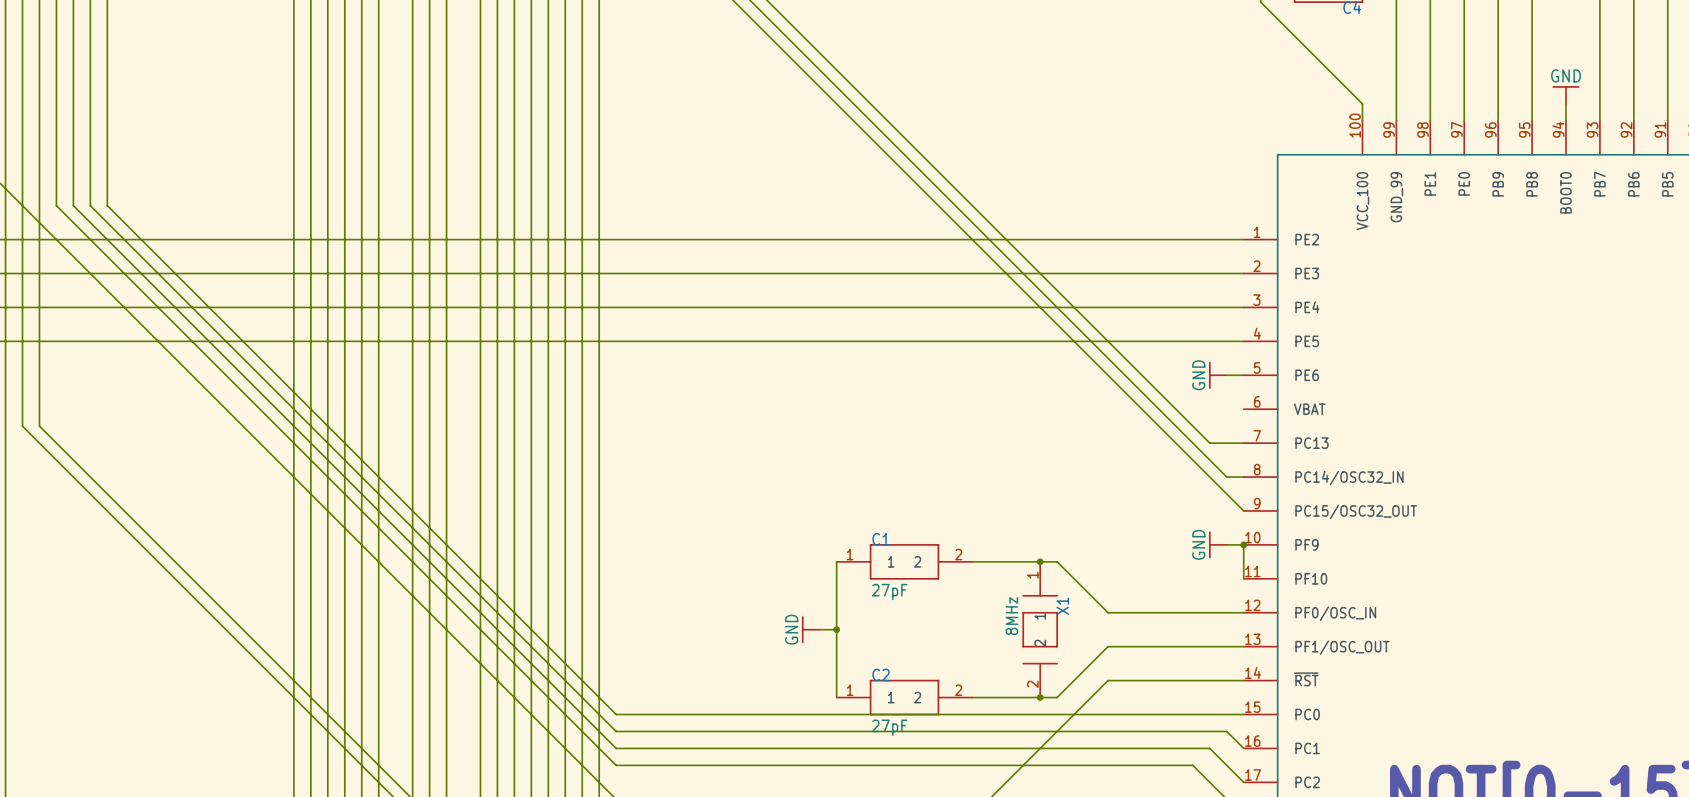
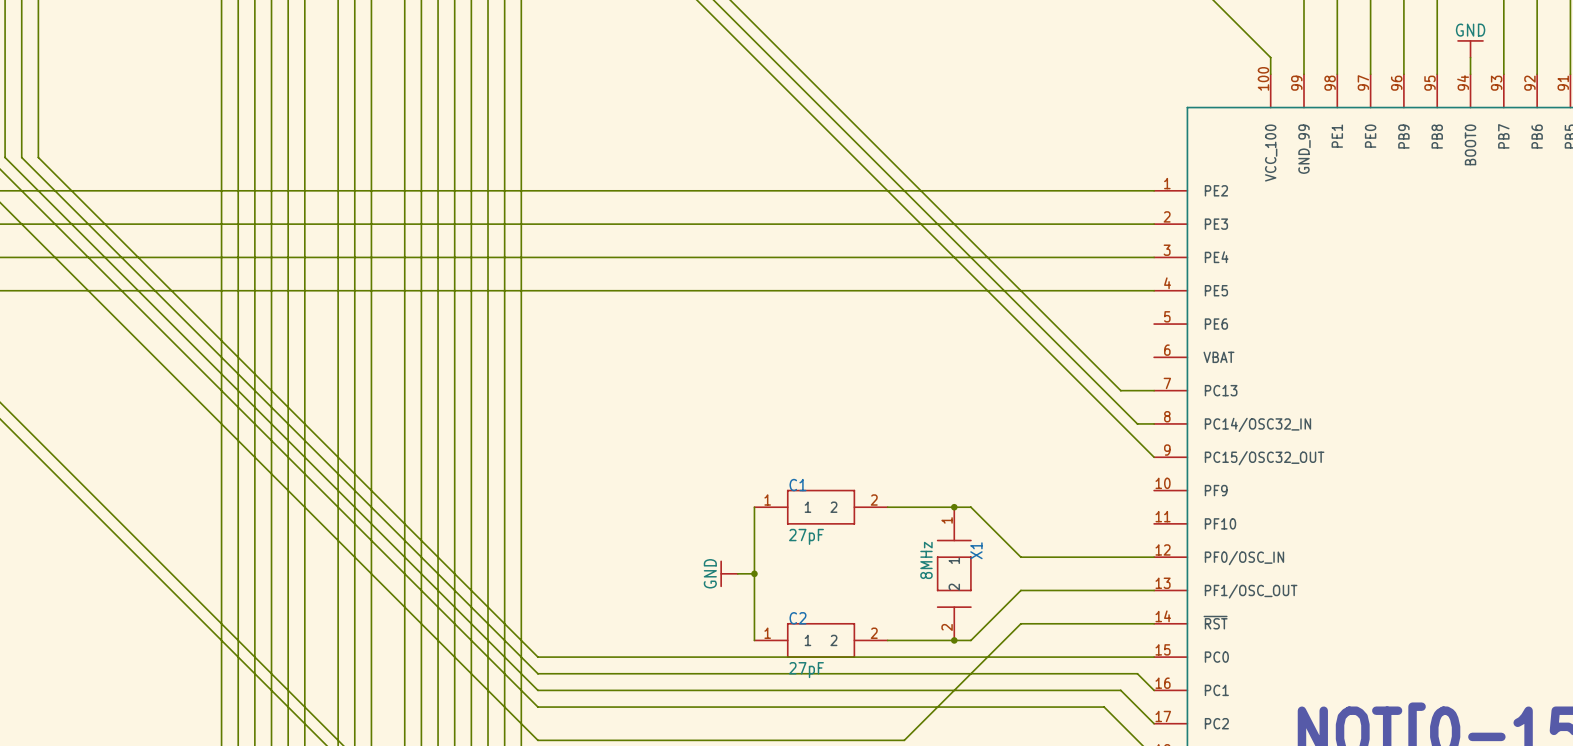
power symbol: GND (1217, 375) -> none
wire: (1226, 375) (1243, 375) -> none
power symbol: GND (1217, 544) -> none
wire: (1226, 544) (1243, 544) (1243, 578) -> none
junction: (1243, 544) -> none

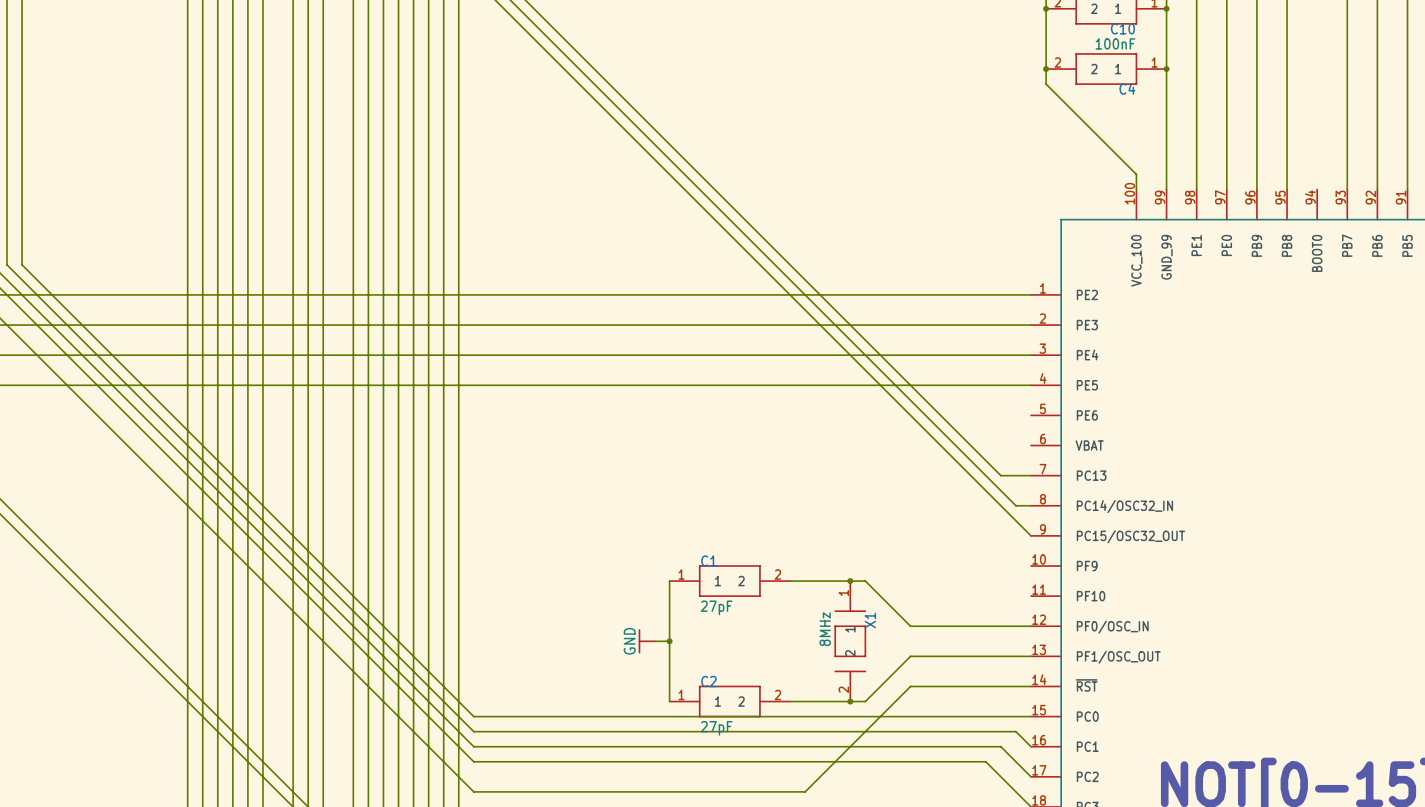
power symbol: GND (1470, 48) -> none
wire: (1470, 57) (1470, 74) -> none

